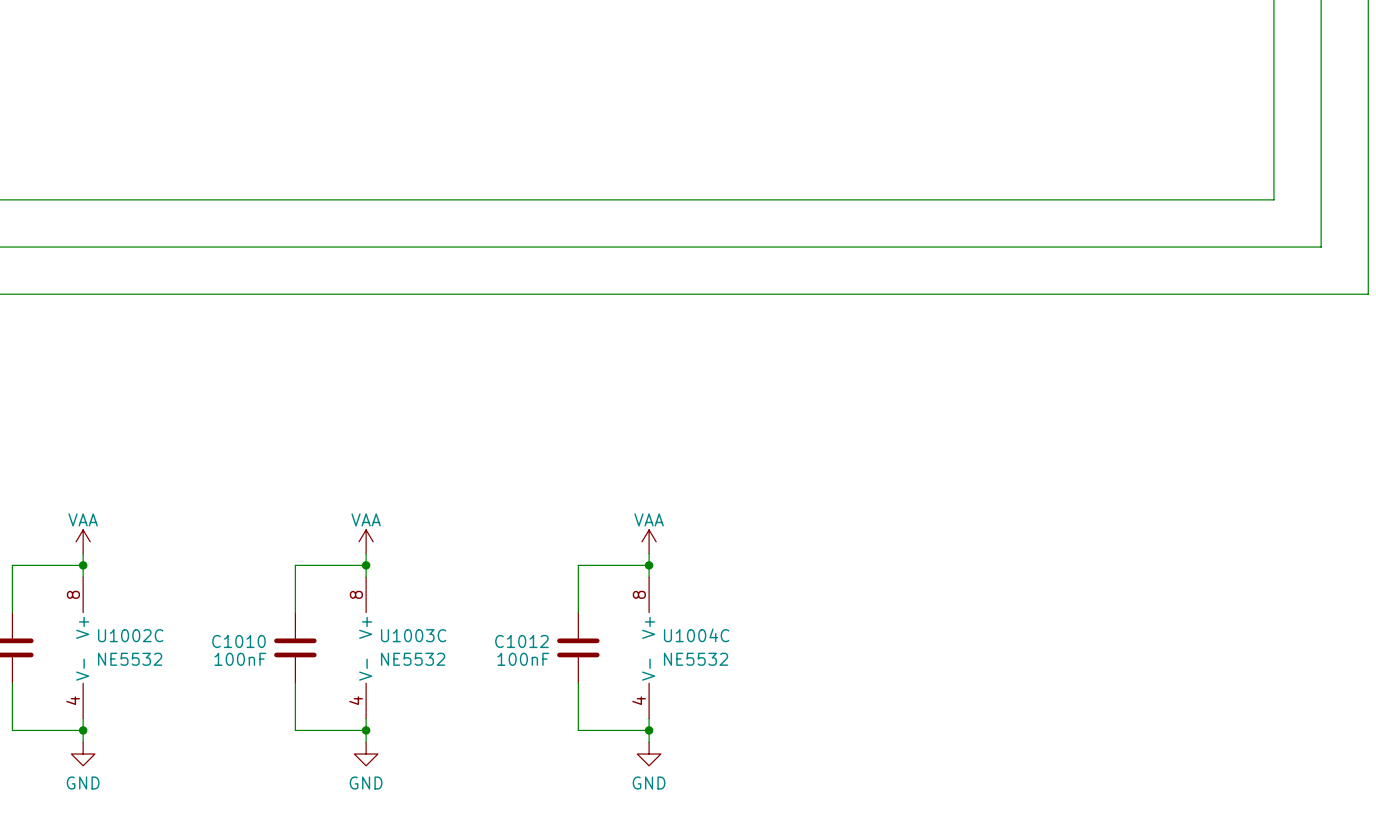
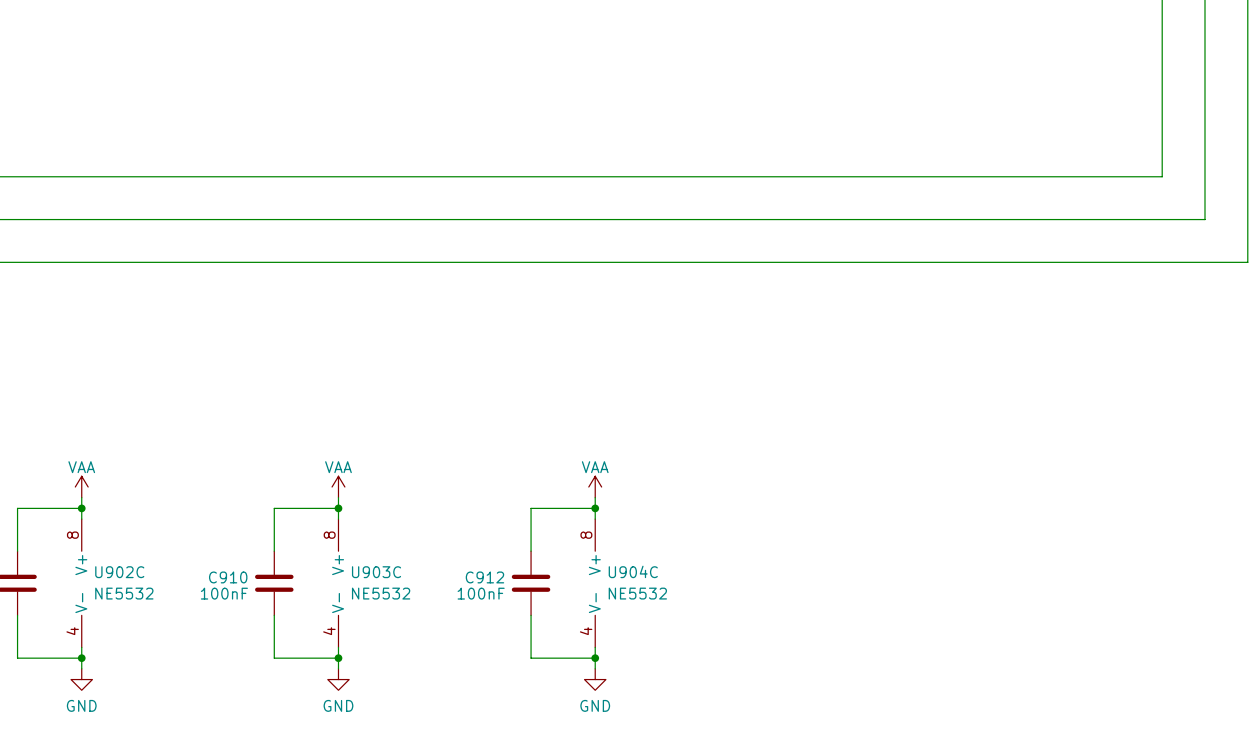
U1002C name: U1002C (130, 635) -> U902C (119, 572)
U1003C name: U1003C (413, 635) -> U903C (376, 572)
U1004C name: U1004C (696, 635) -> U904C (633, 571)
C1010 name: C1010 (238, 641) -> C910 (228, 577)
C1012 name: C1012 (521, 641) -> C912 (484, 577)

